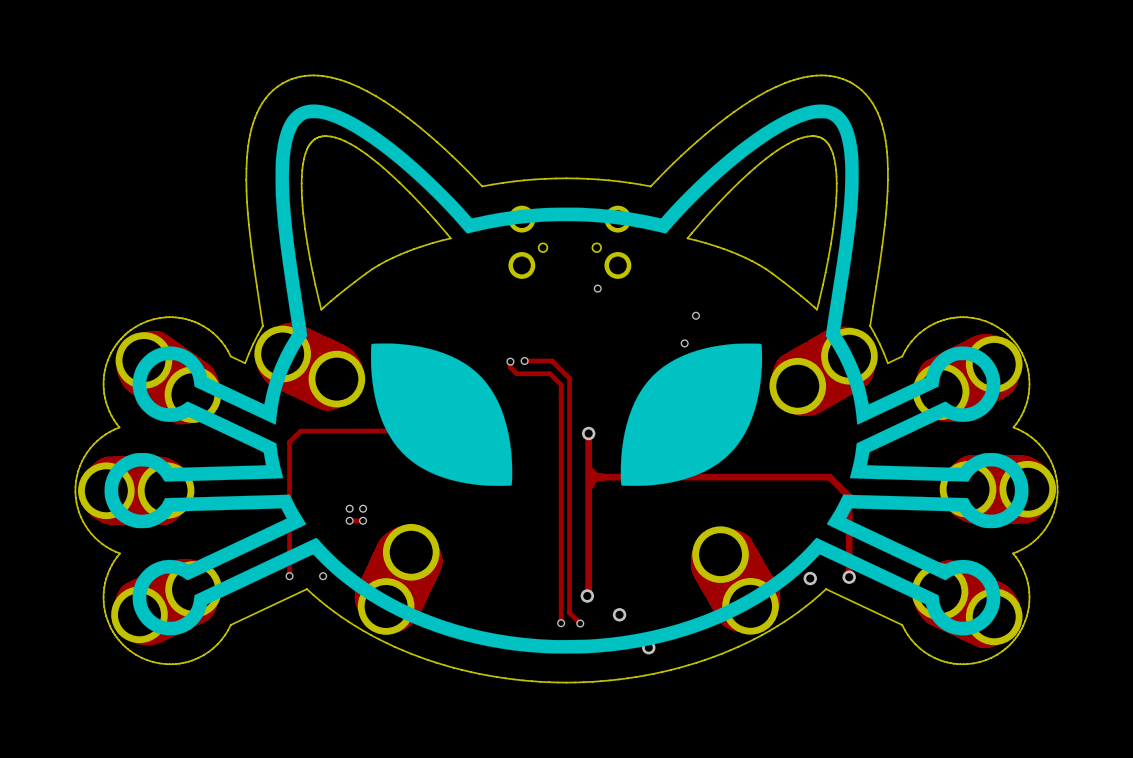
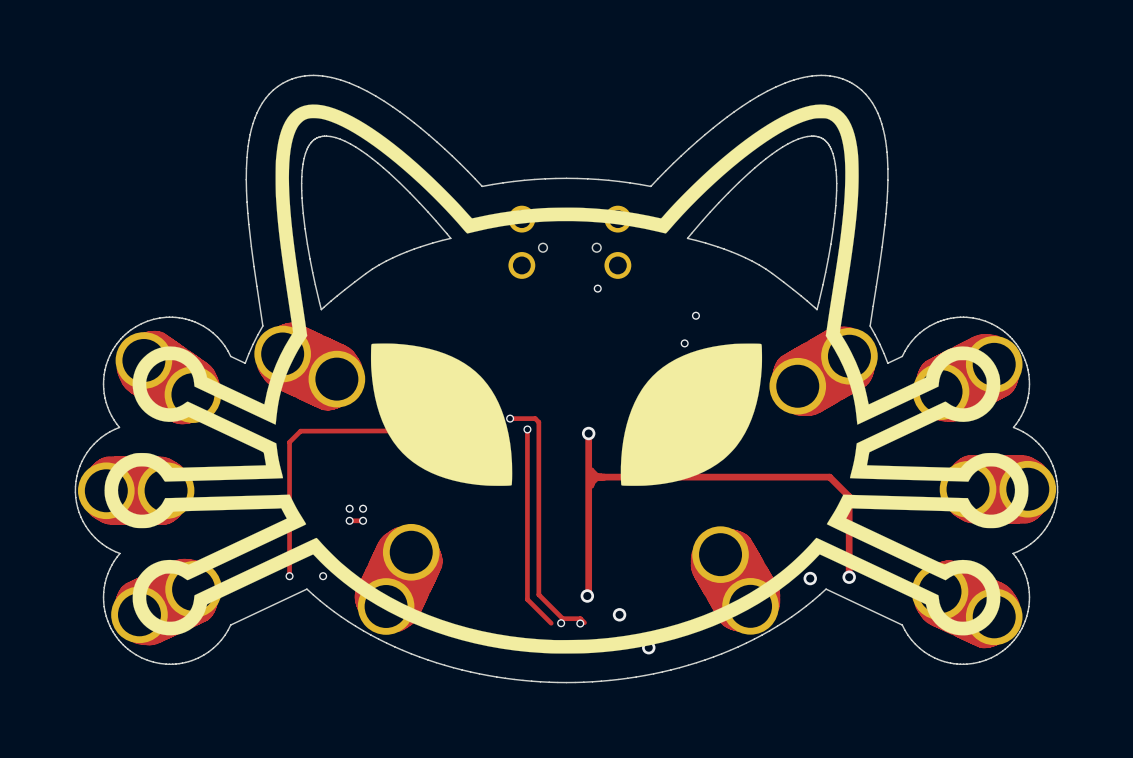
track: (524, 360) (552, 360) (569, 378) (569, 612) (580, 623) -> none
via: (524, 360) -> none
track: (510, 361) (510, 367) (516, 373) (550, 373) (561, 384) (561, 623) -> none
via: (510, 361) -> none
track: none -> (510, 418) (535, 418) (538, 422) (538, 594) (562, 618) (580, 618) (584, 622)
via: none -> (510, 418)
track: none -> (527, 429) (527, 599) (551, 623)
via: none -> (527, 429)

